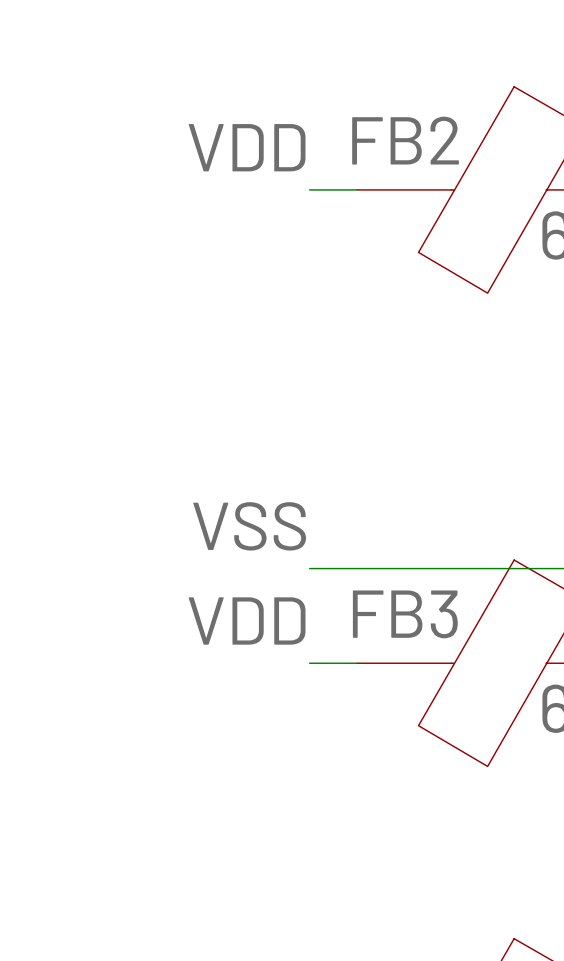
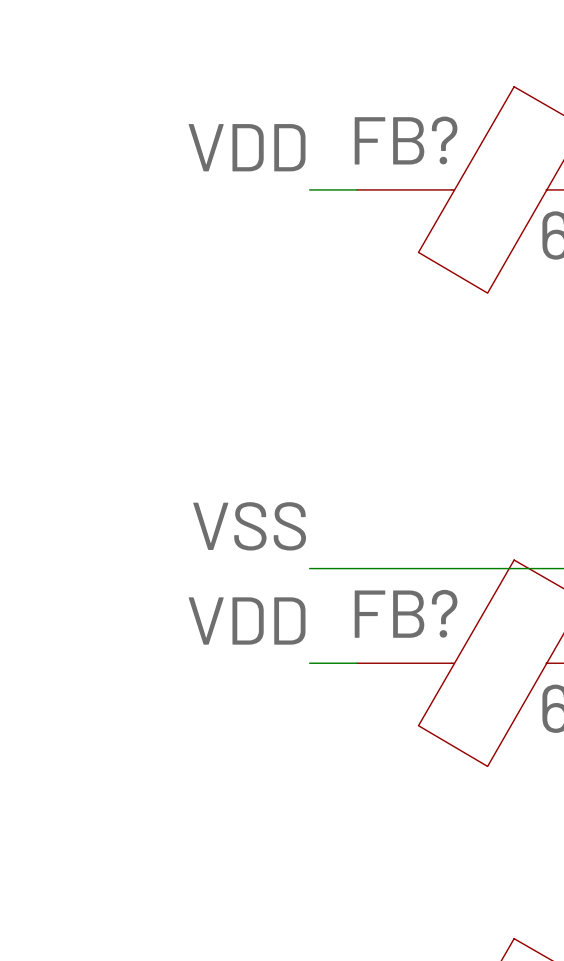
FB2 name: FB2 (405, 140) -> FB? (406, 140)
FB3 name: FB3 (405, 614) -> FB? (406, 613)

